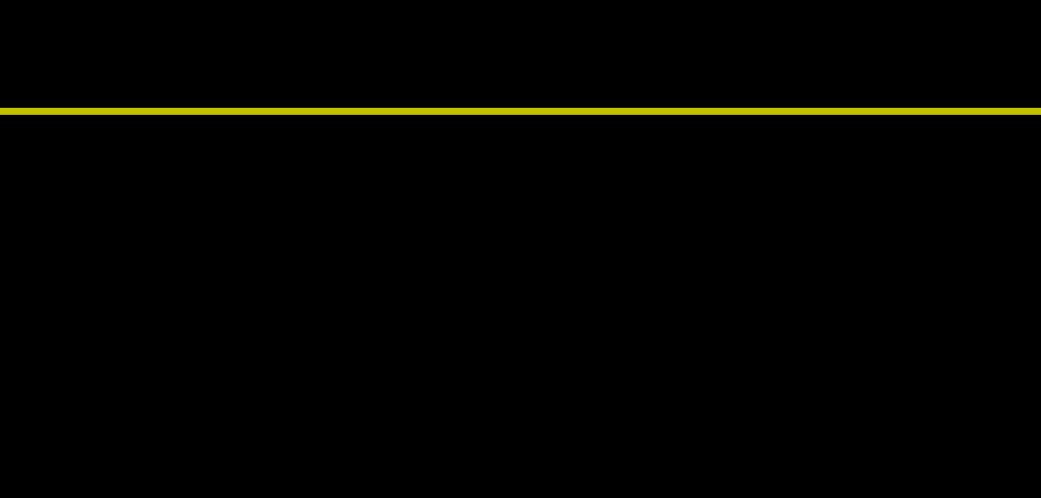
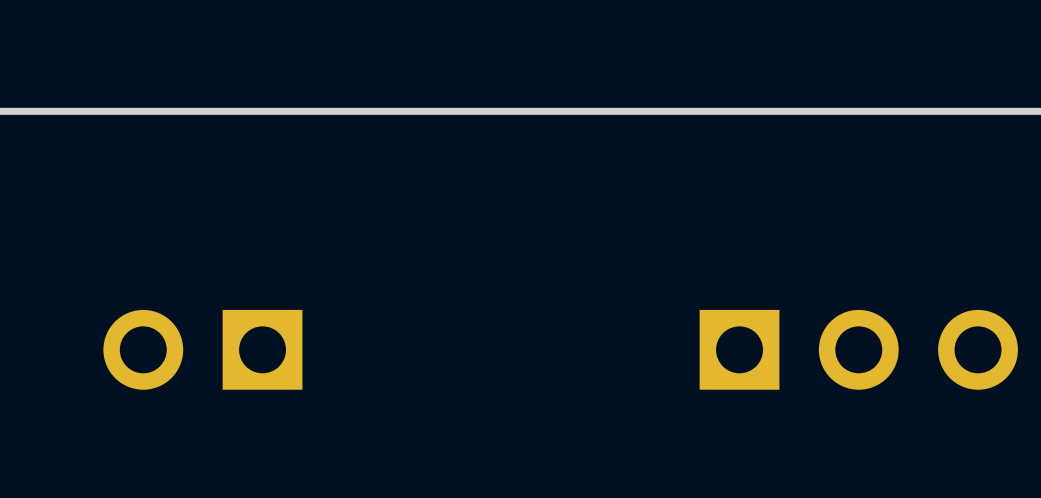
part: none -> (202, 349)
part: none -> (858, 349)

